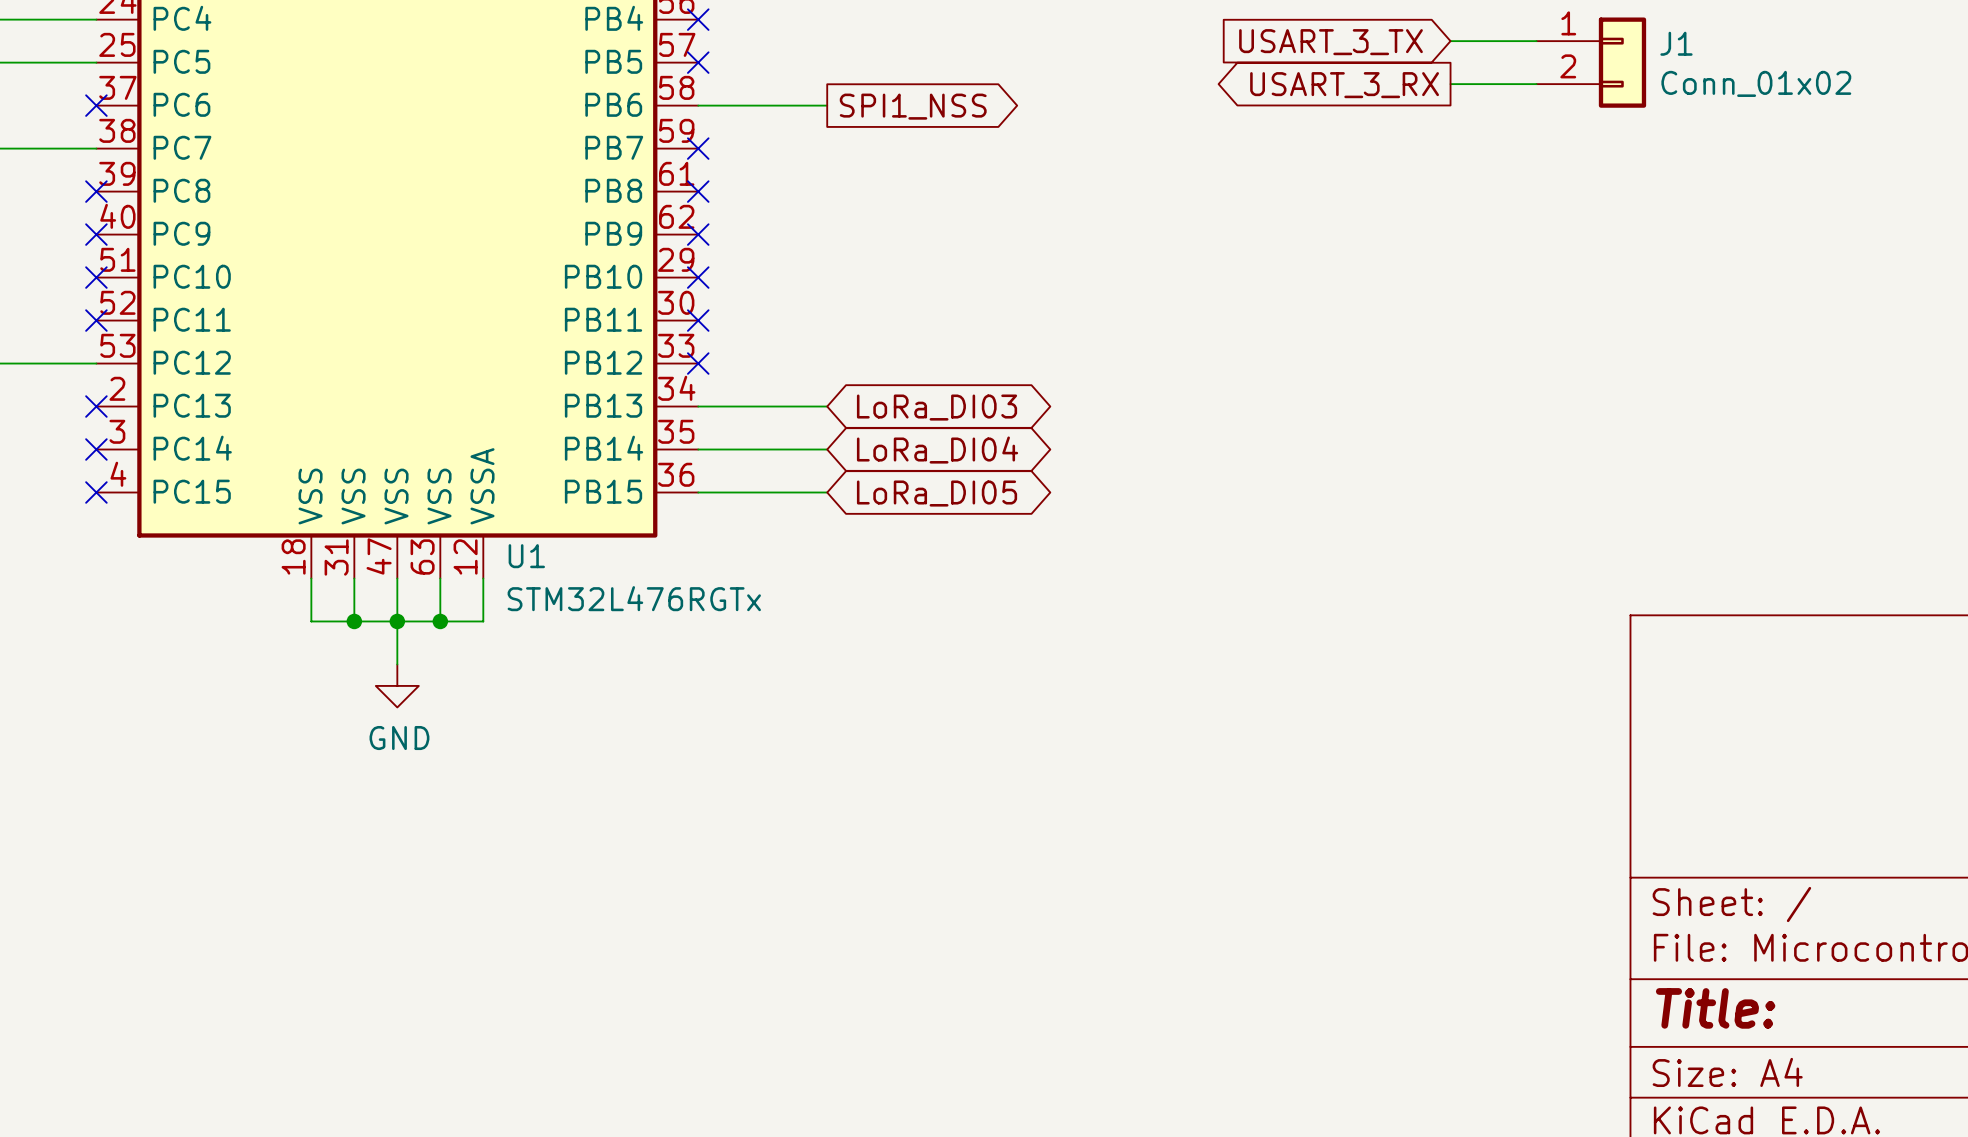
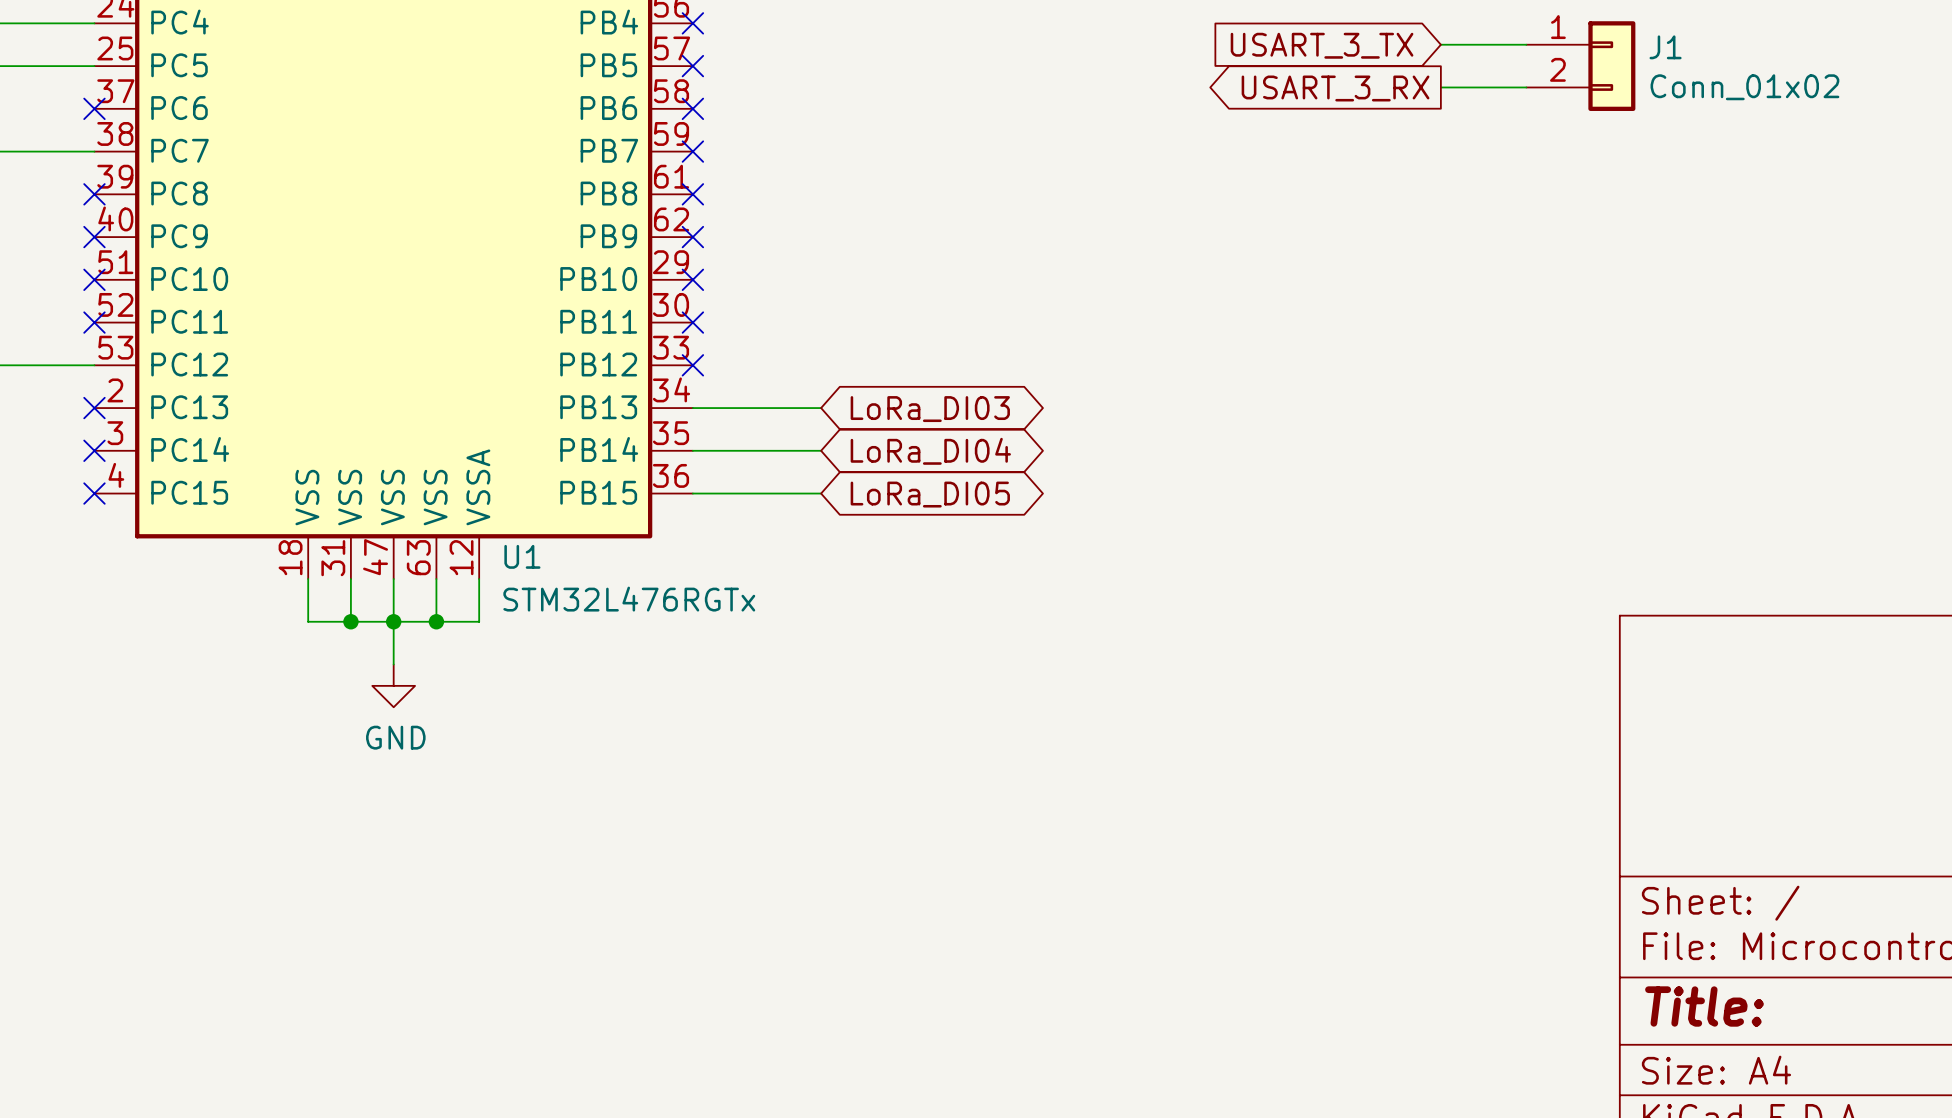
wire: (698, 105) (827, 105) -> none
no-connect mark: none -> (692, 108)
global label: SPI1_NSS (913, 106) -> none

